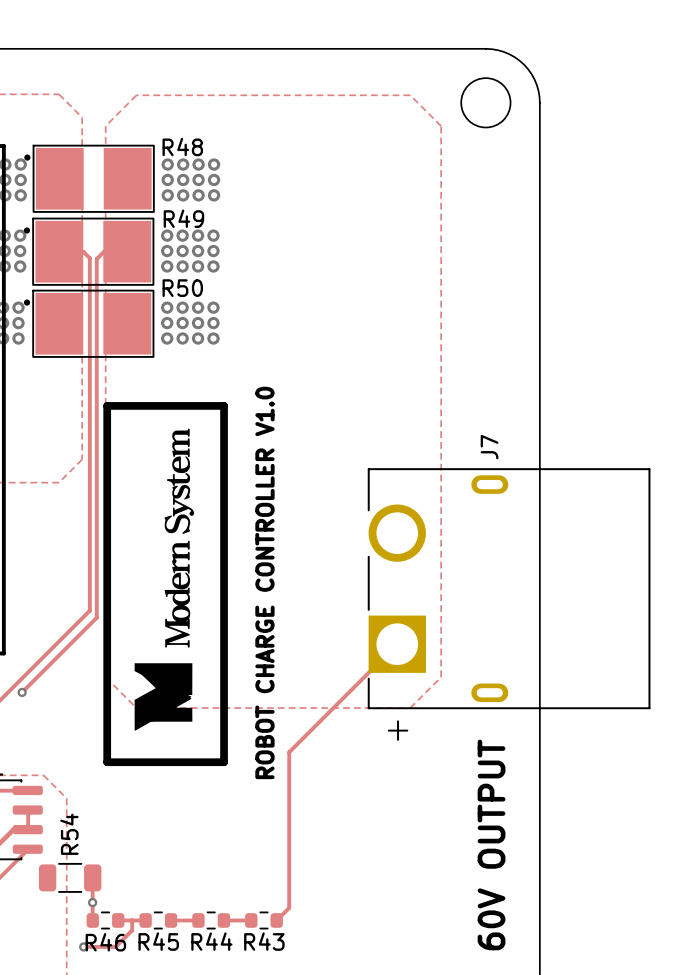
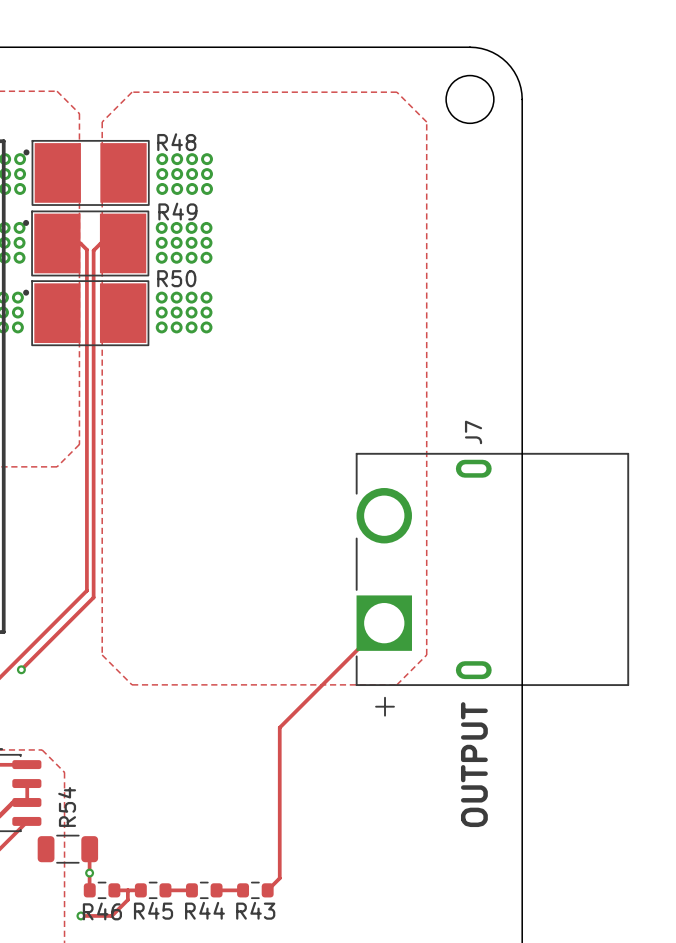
line: (107, 405) (224, 405) (224, 762) (107, 762) (107, 405) -> none
drawing: [134, 428, 195, 731] -> none
text: ROBOT CHARGE CONTROLLER V1.0 (264, 582) -> none
text: 60V OUTPUT (491, 844) -> OUTPUT (474, 764)

